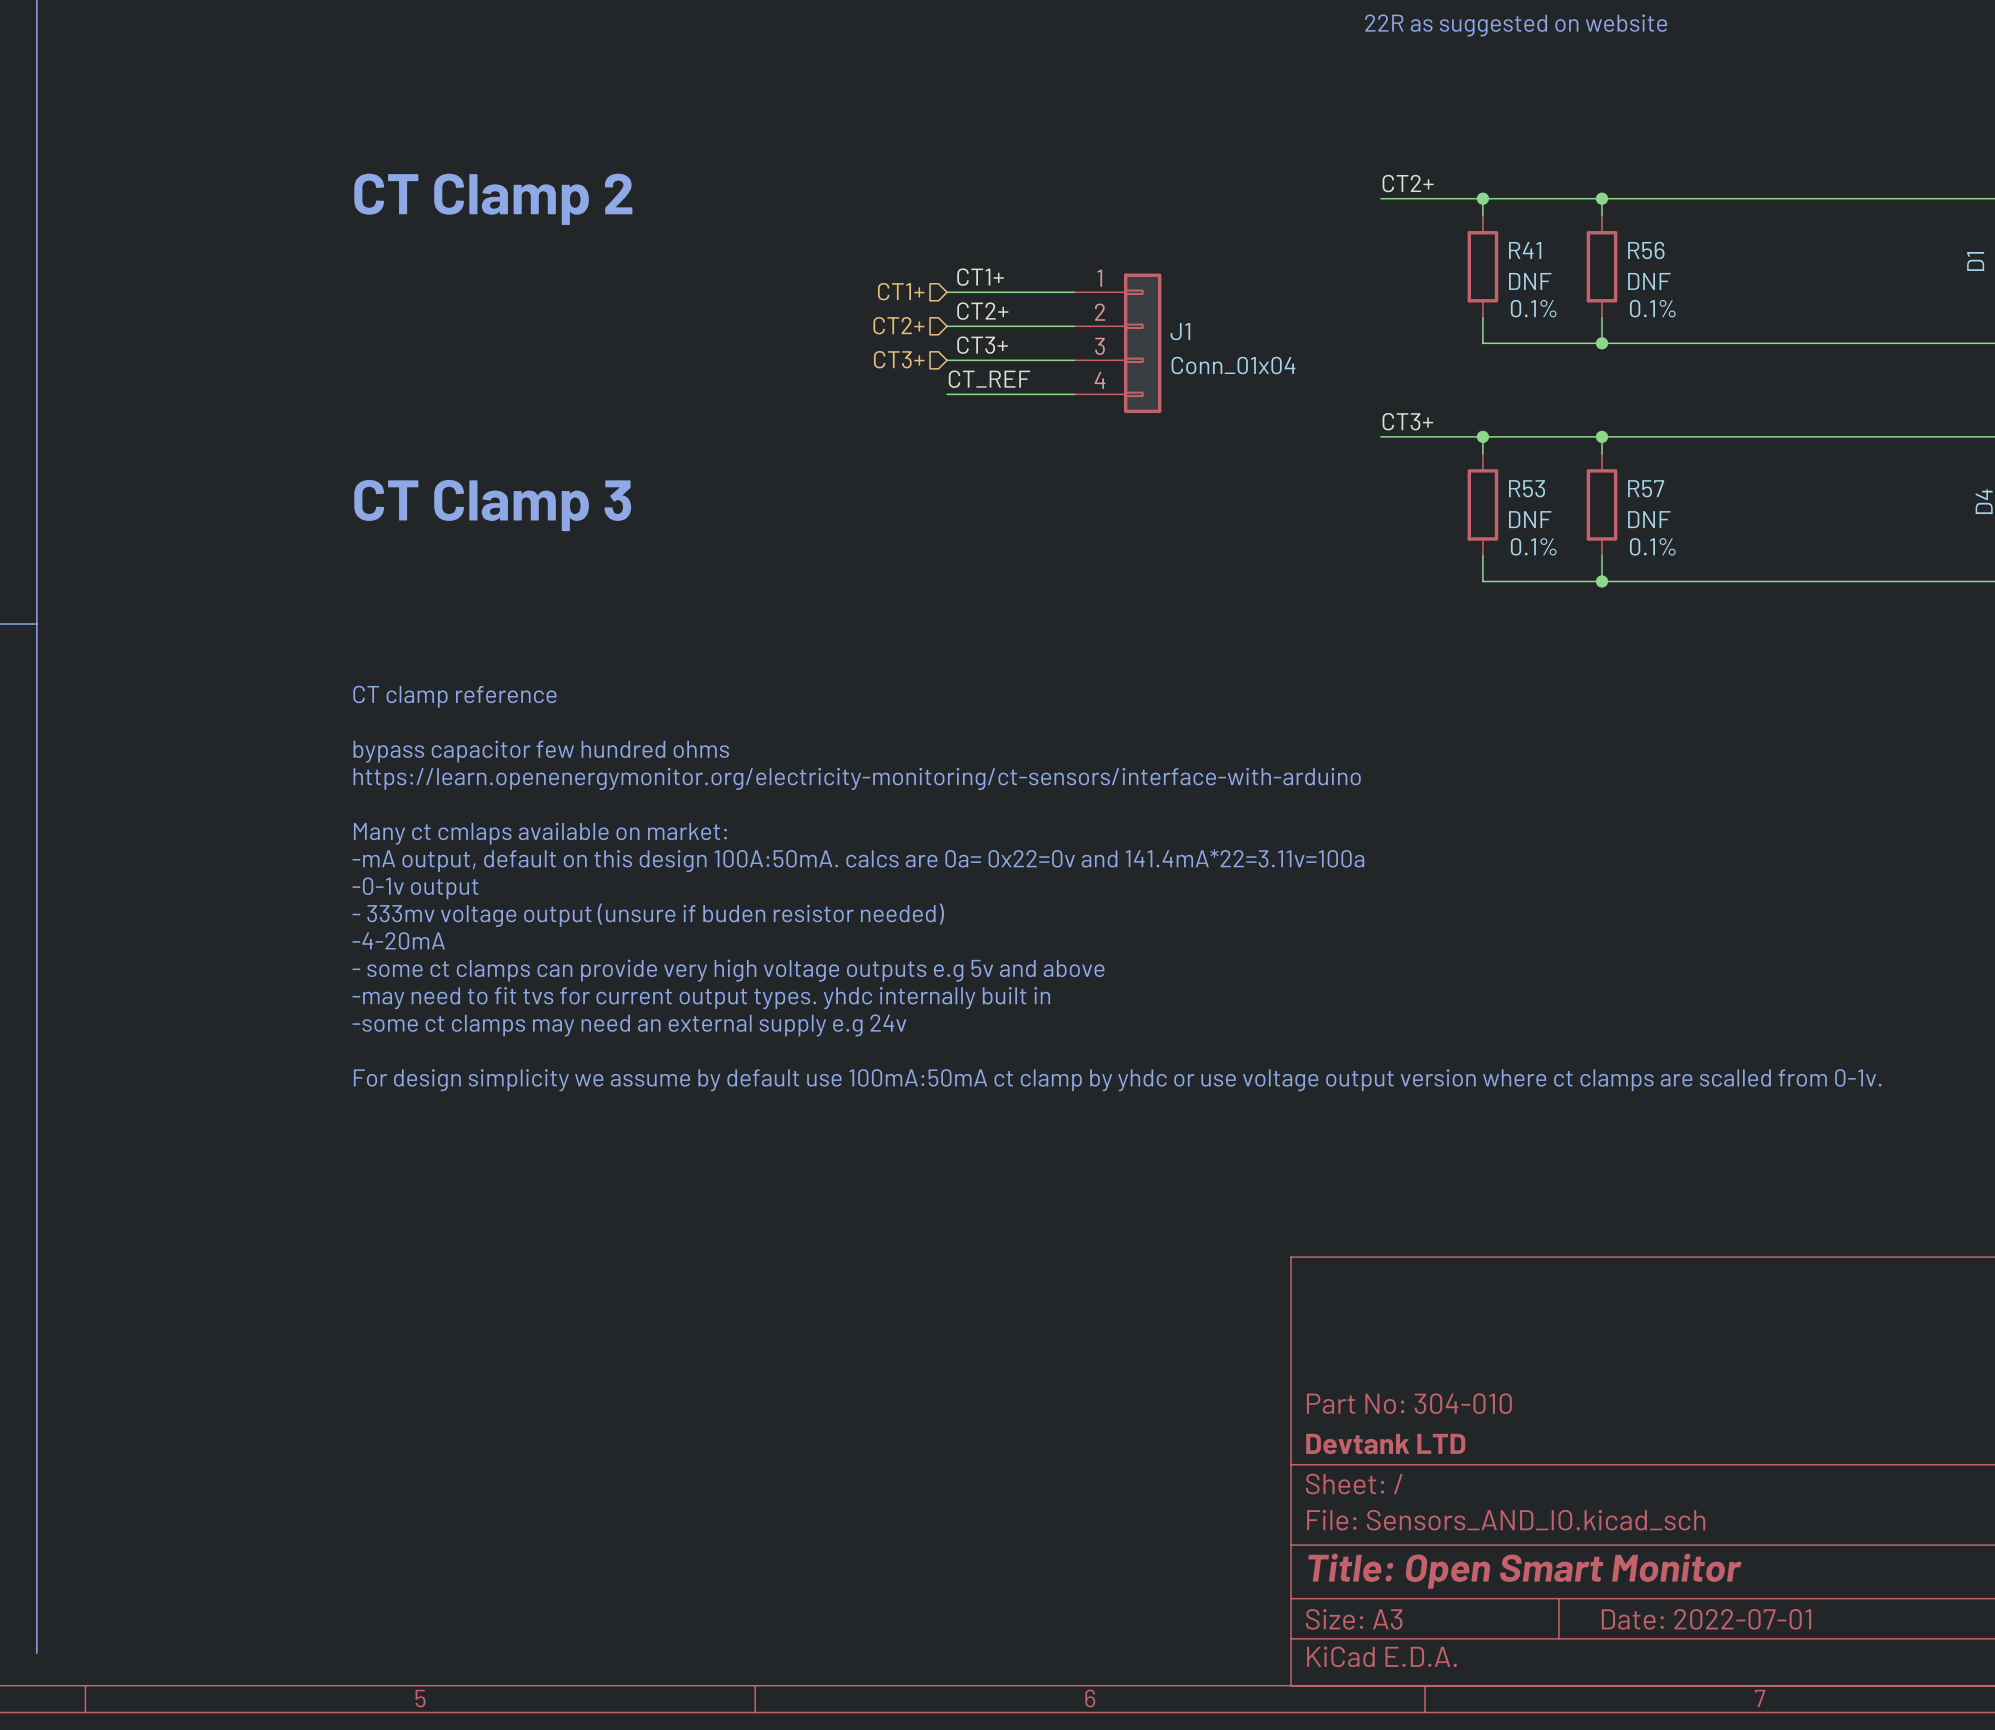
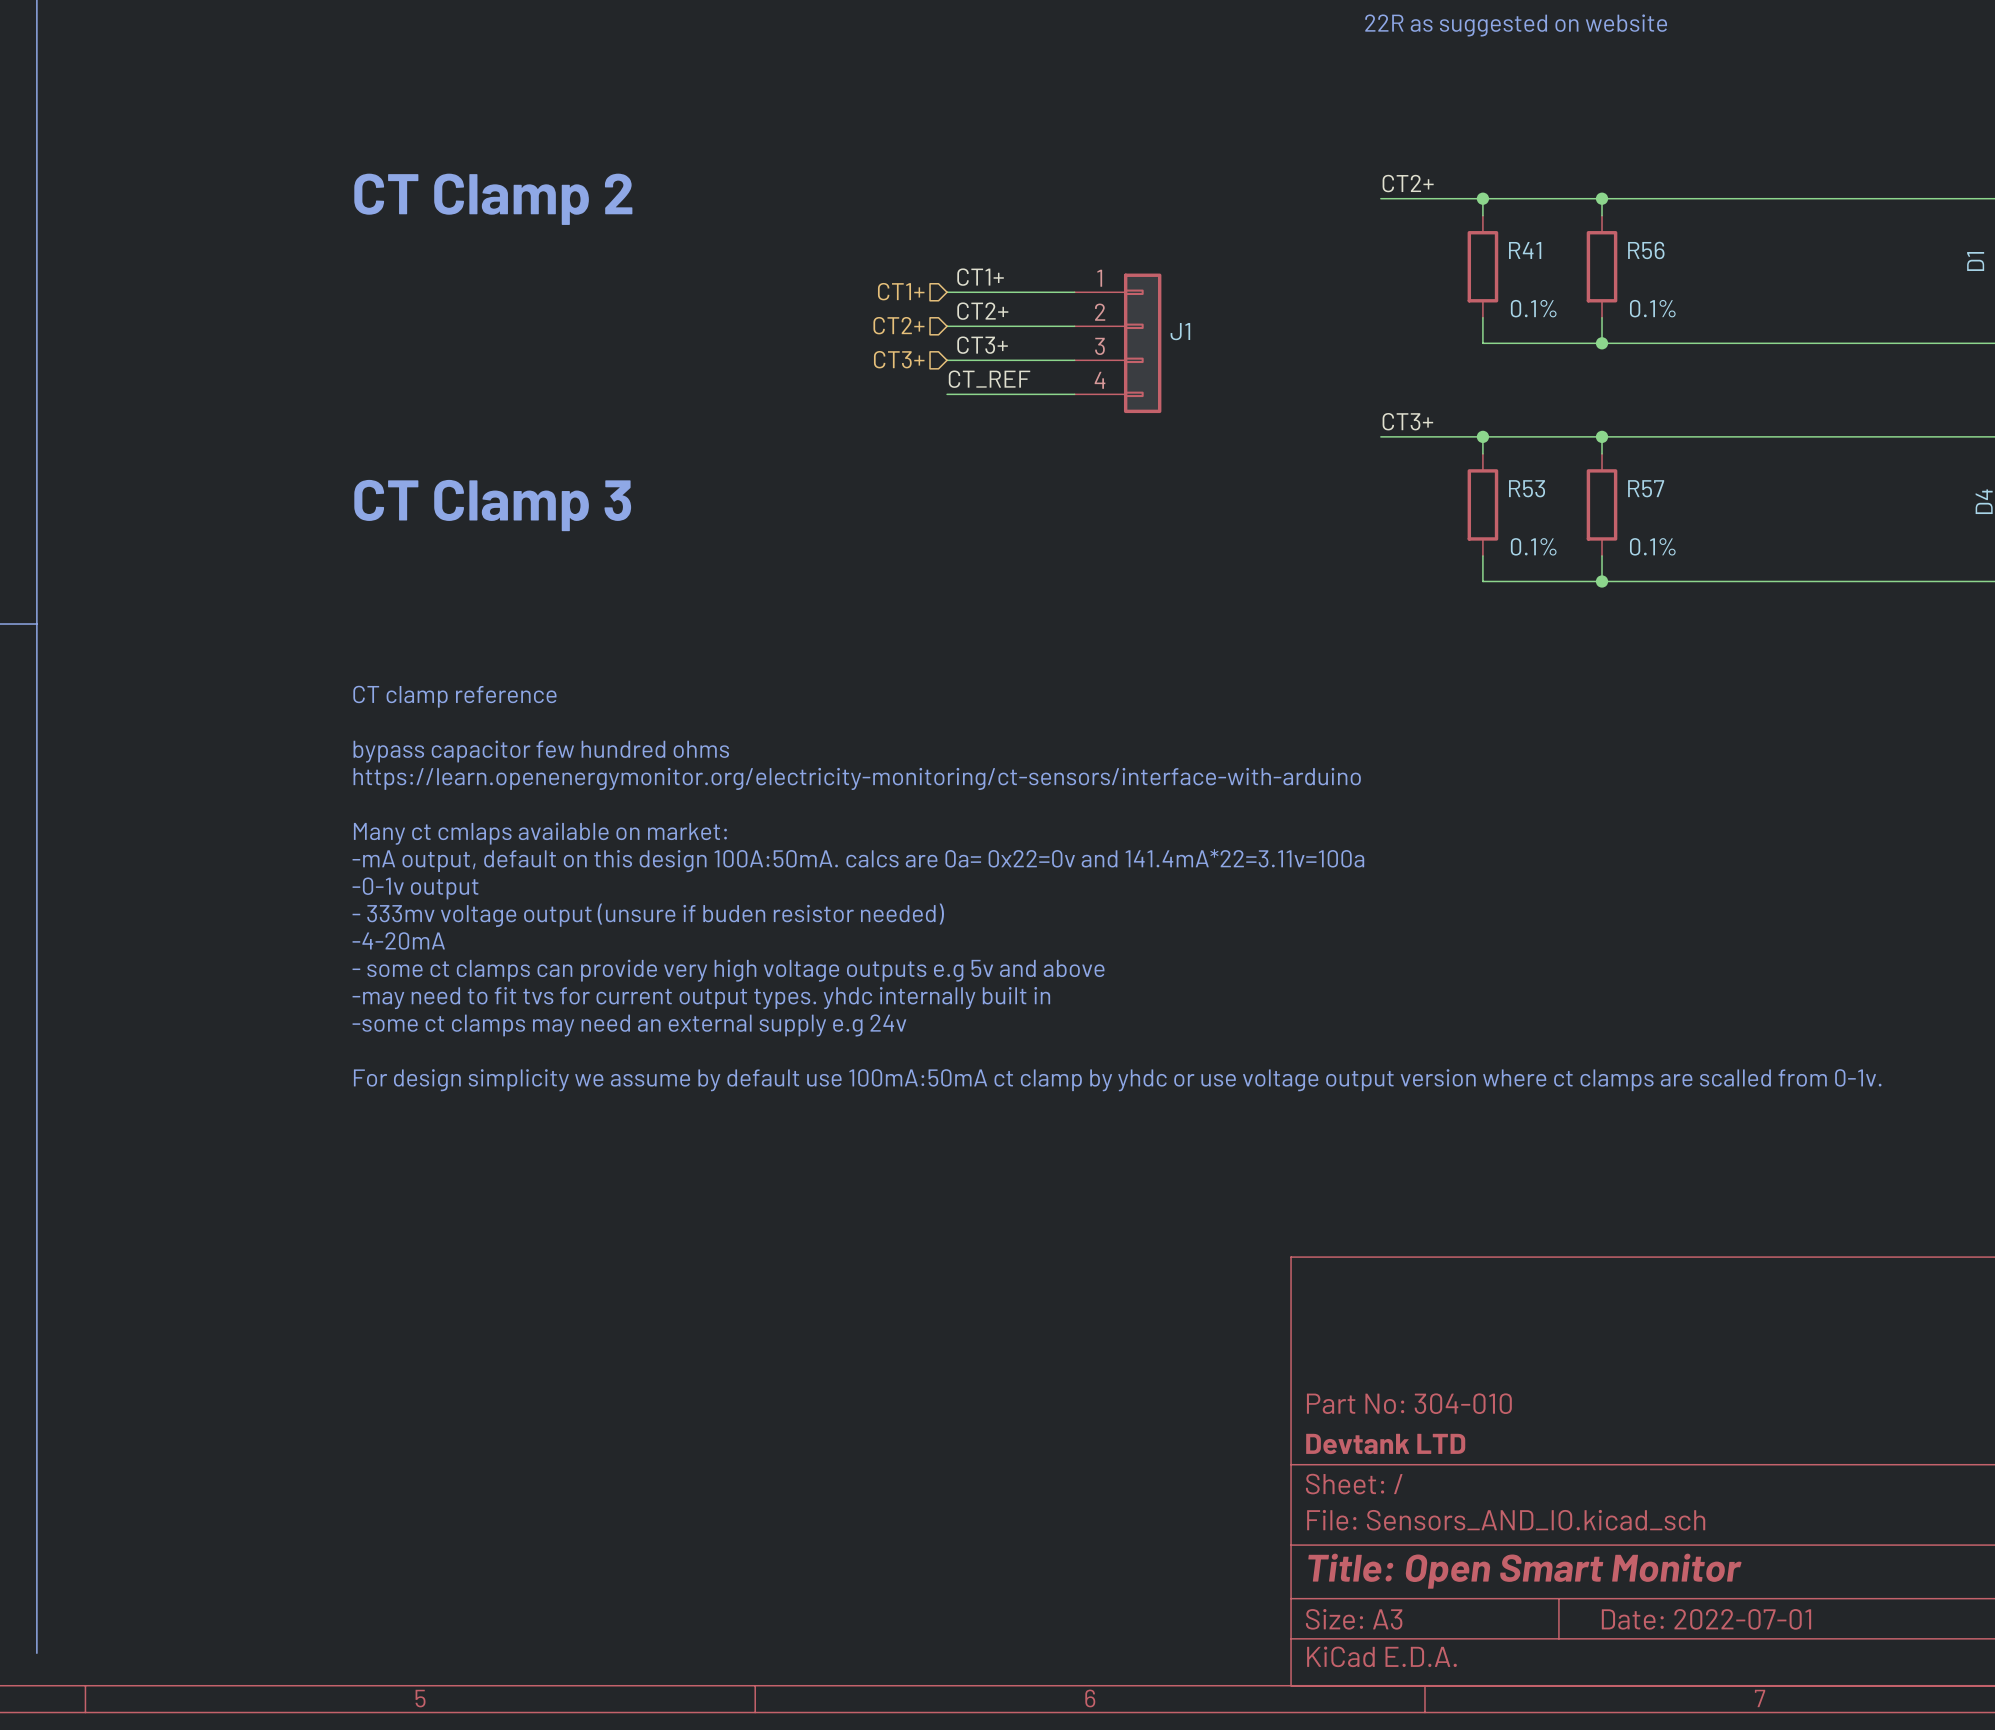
R41 value: DNF (1530, 281) -> none
R56 value: DNF (1649, 281) -> none
J1 value: Conn_01x04 (1233, 365) -> none
R53 value: DNF (1530, 519) -> none
R57 value: DNF (1649, 519) -> none

